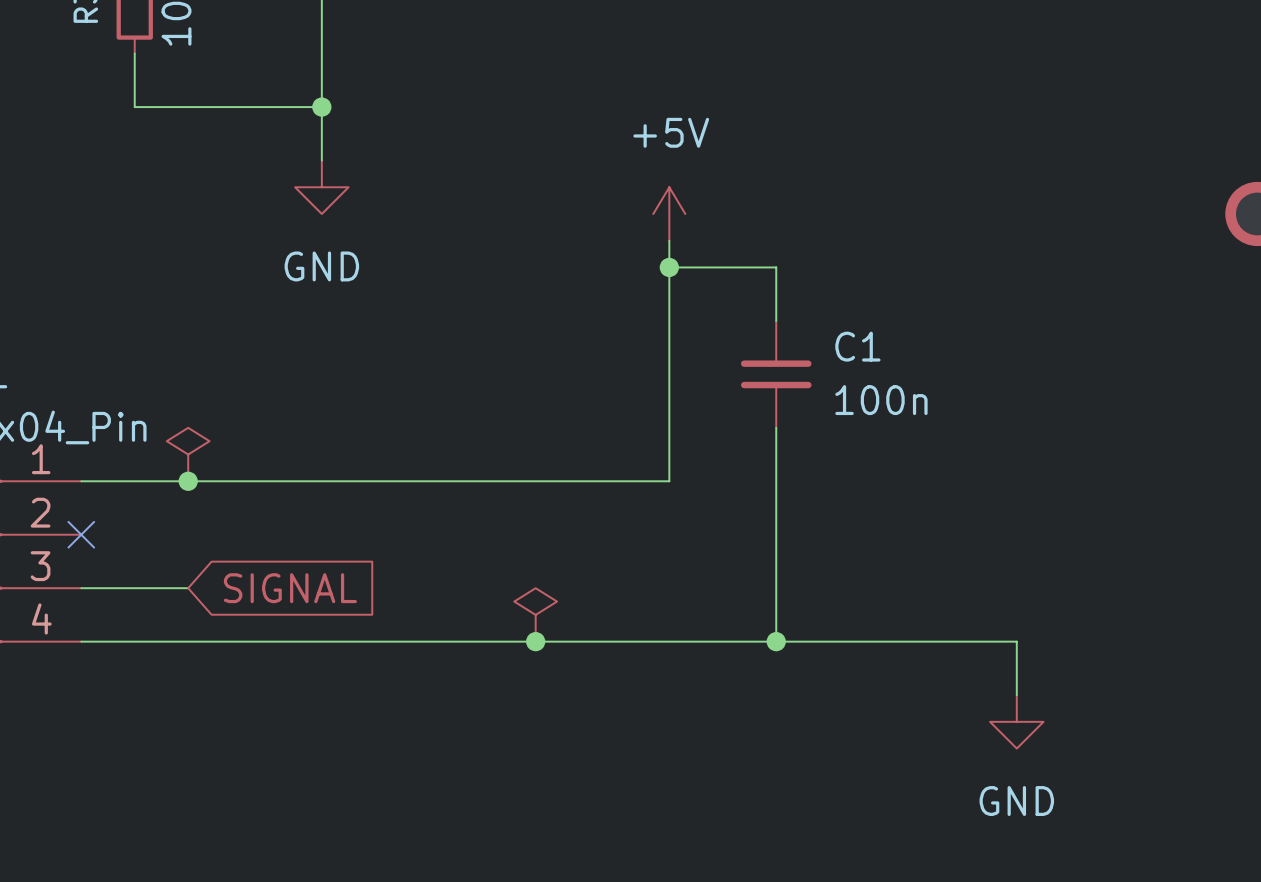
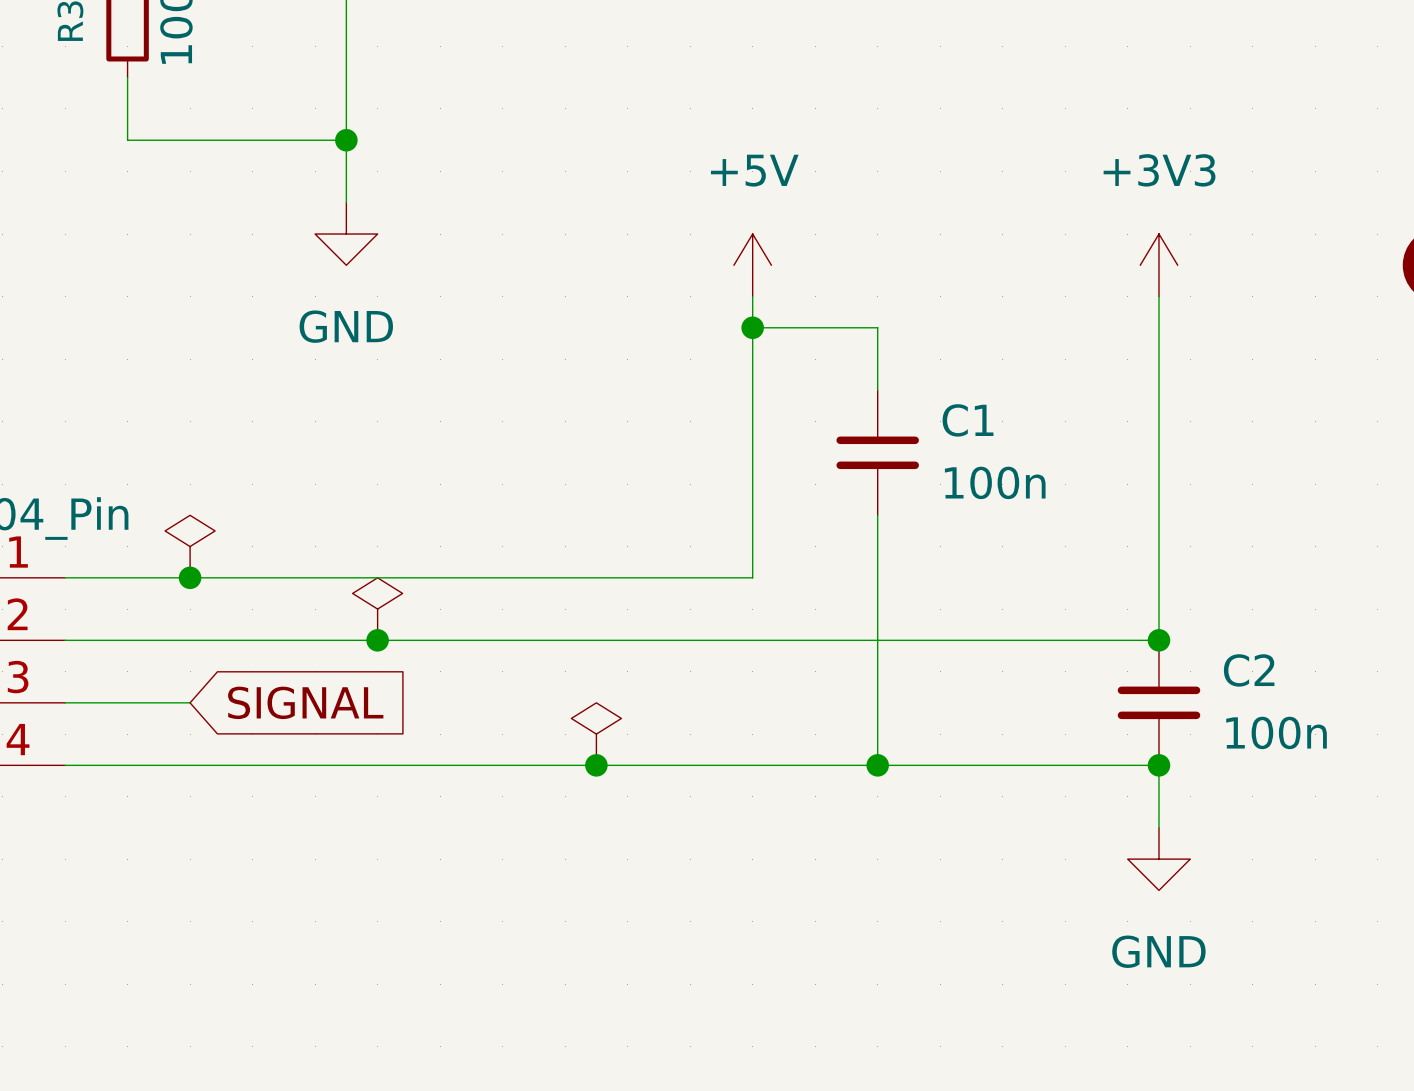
power symbol: none -> +3V3 (1158, 265)
wire: none -> (1158, 296) (1158, 640) (65, 640)
power symbol: none -> (377, 609)
no-connect mark: (81, 534) -> none
junction: none -> (377, 640)
junction: none -> (1158, 640)
C2: none -> 100n (1158, 702)
junction: none -> (1158, 765)

